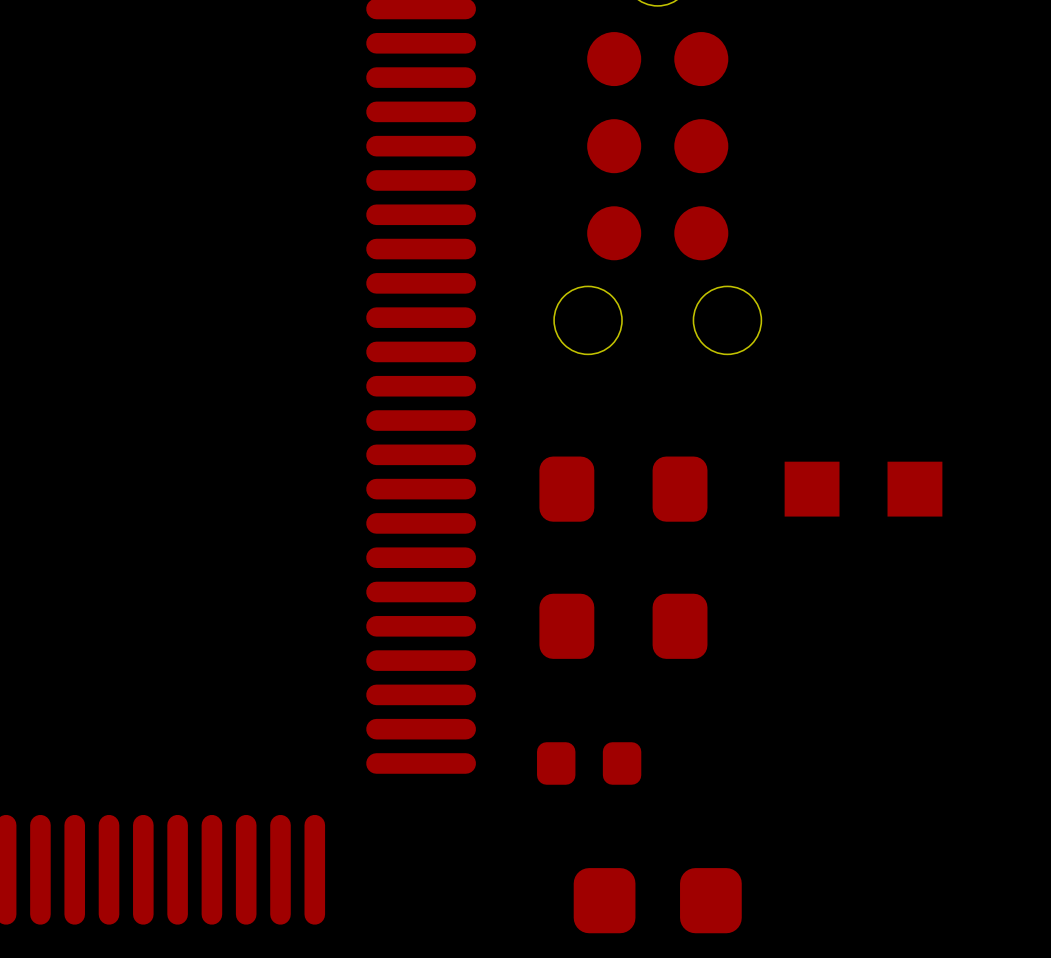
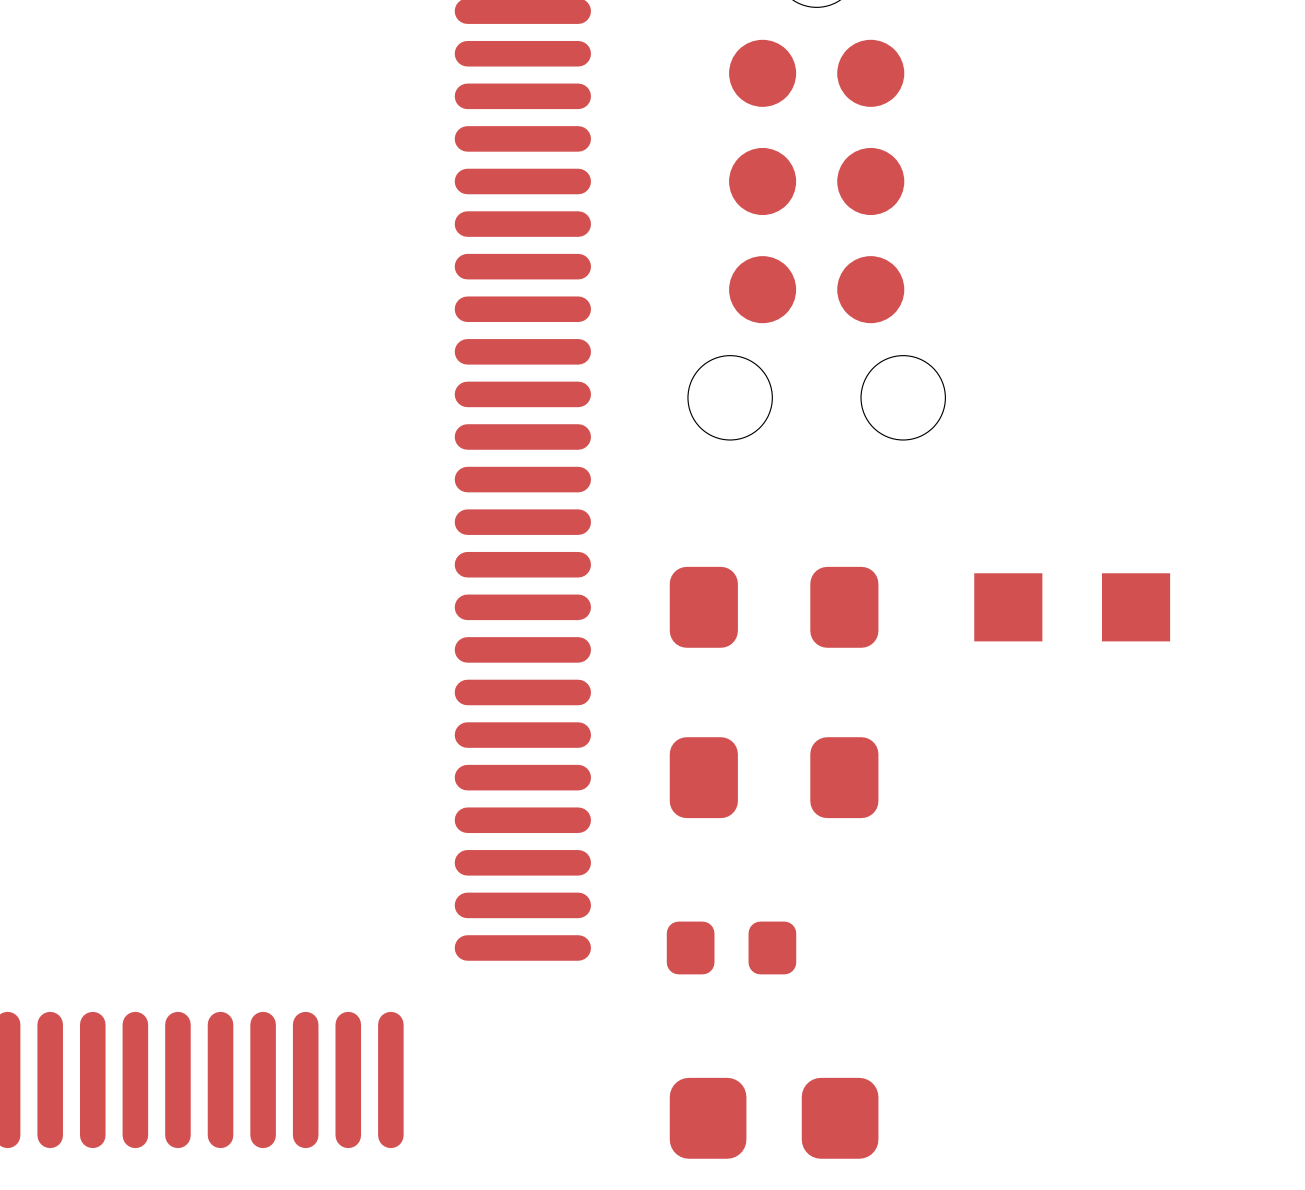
part position: (657, 900) -> (774, 1118)

